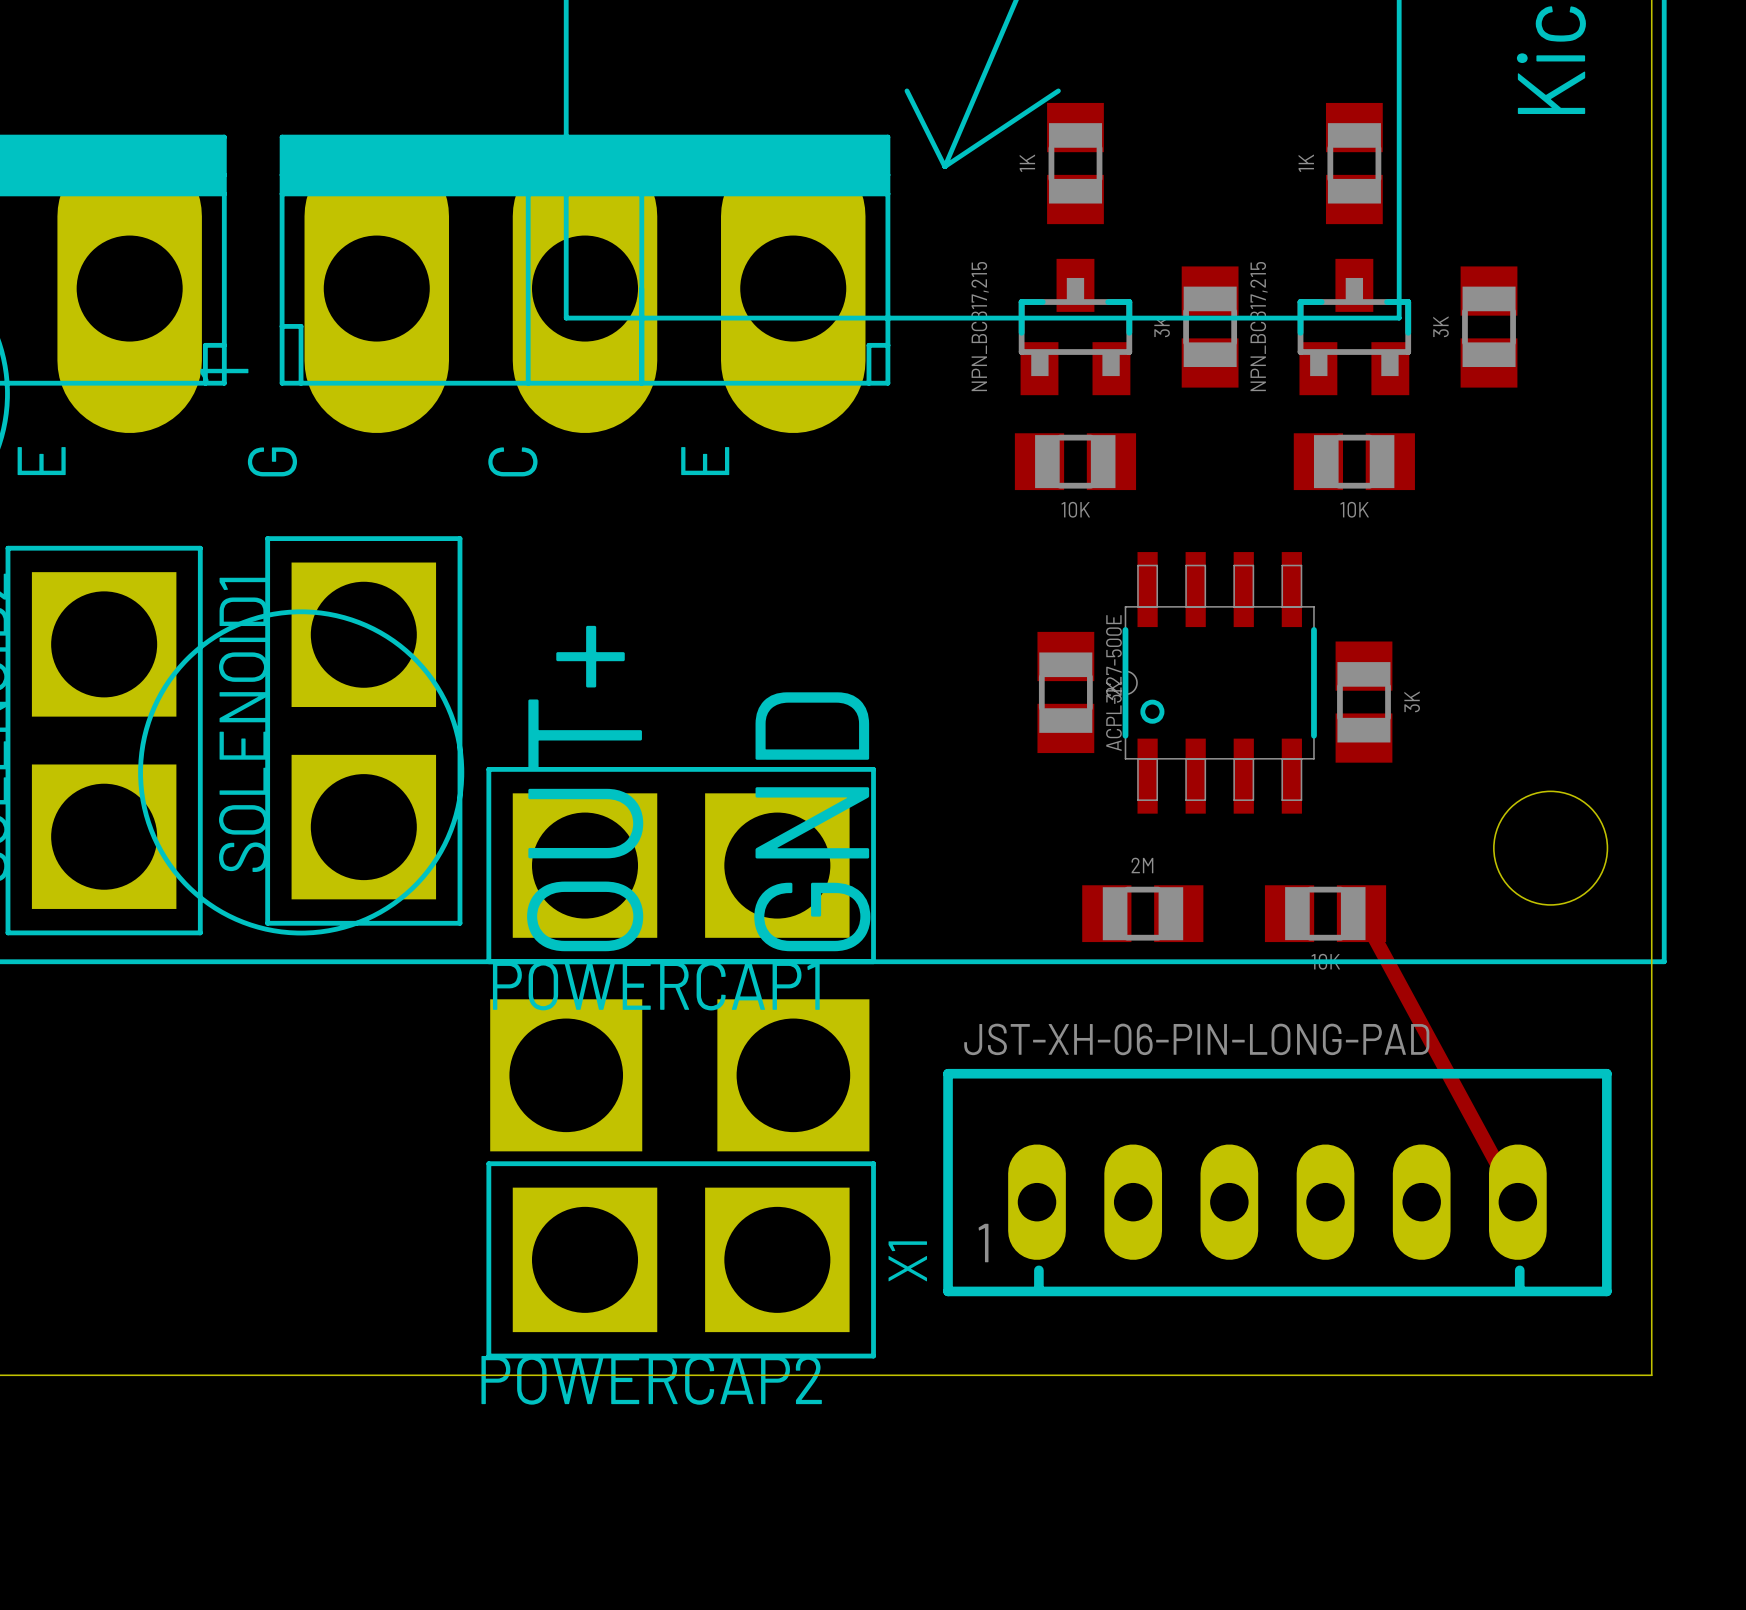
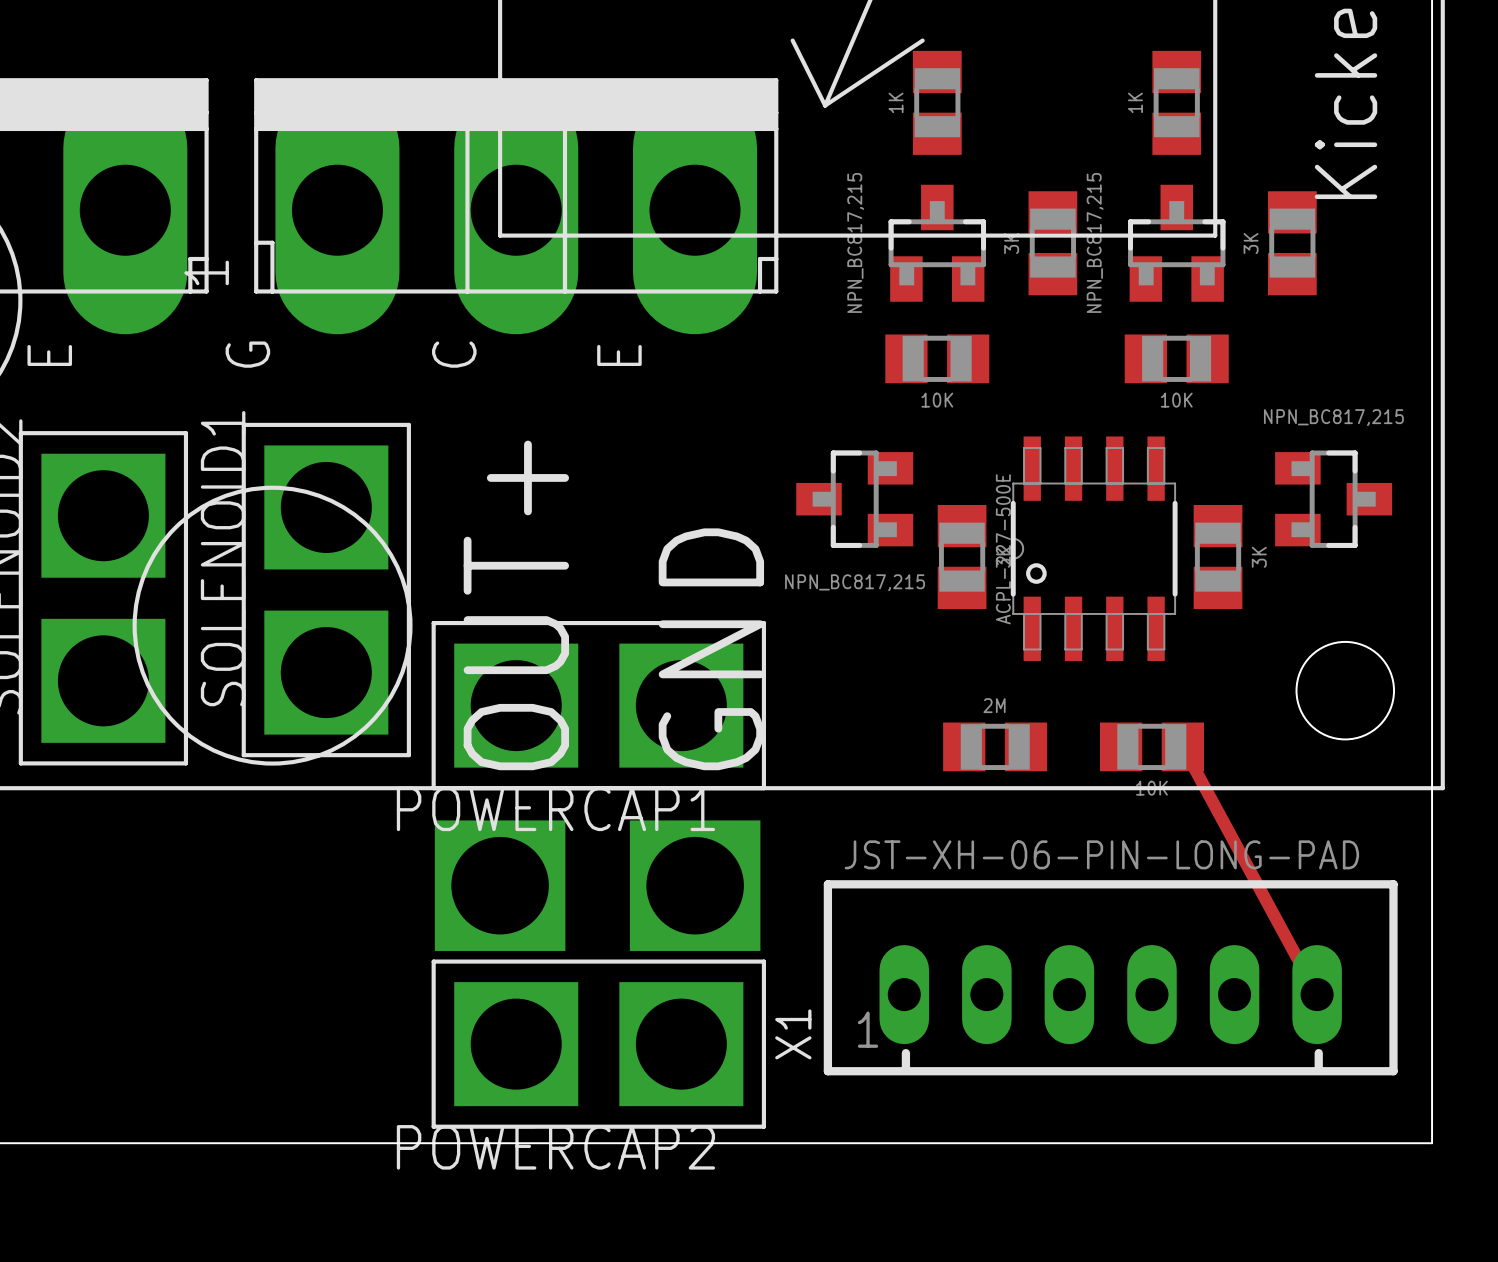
part: none -> NPN_BC817,215 (854, 499)
part: none -> NPN_BC817,215 (1333, 499)
part position: (1219, 682) -> (1094, 548)
part position: (1065, 692) -> (962, 557)
part position: (1363, 702) -> (1218, 557)

